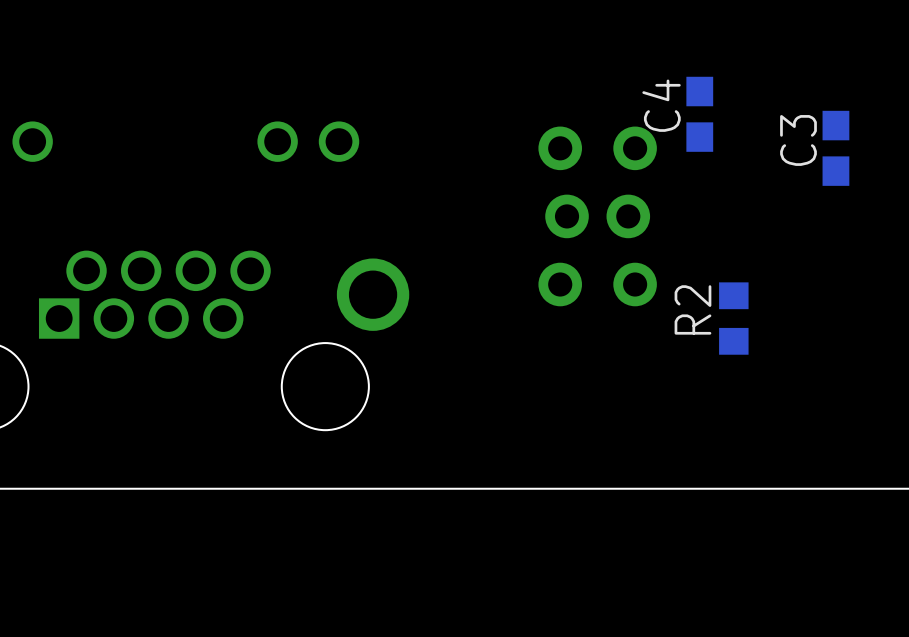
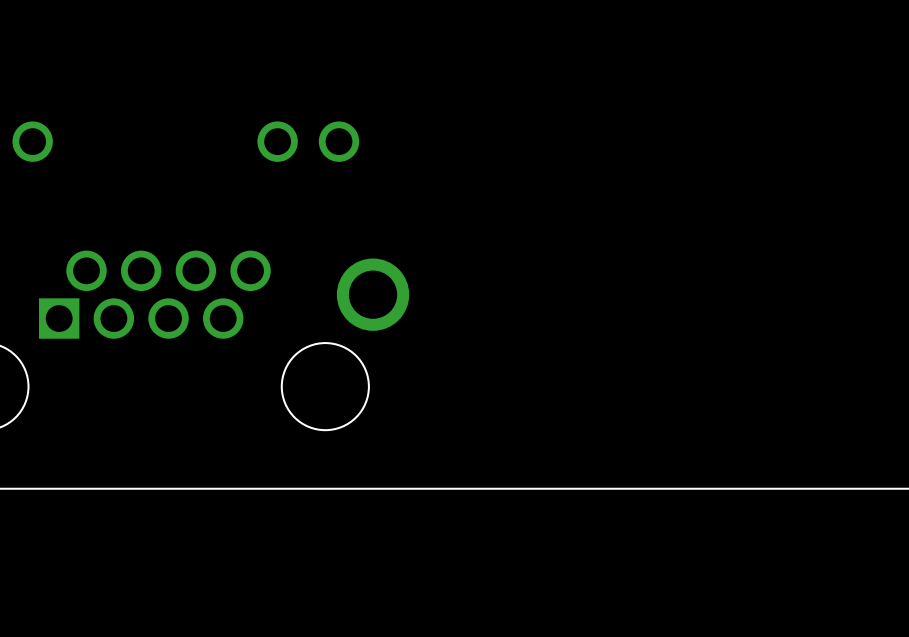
C4: (699, 114) -> none
C3: (835, 148) -> none
part: (597, 216) -> none
R2: (733, 318) -> none

